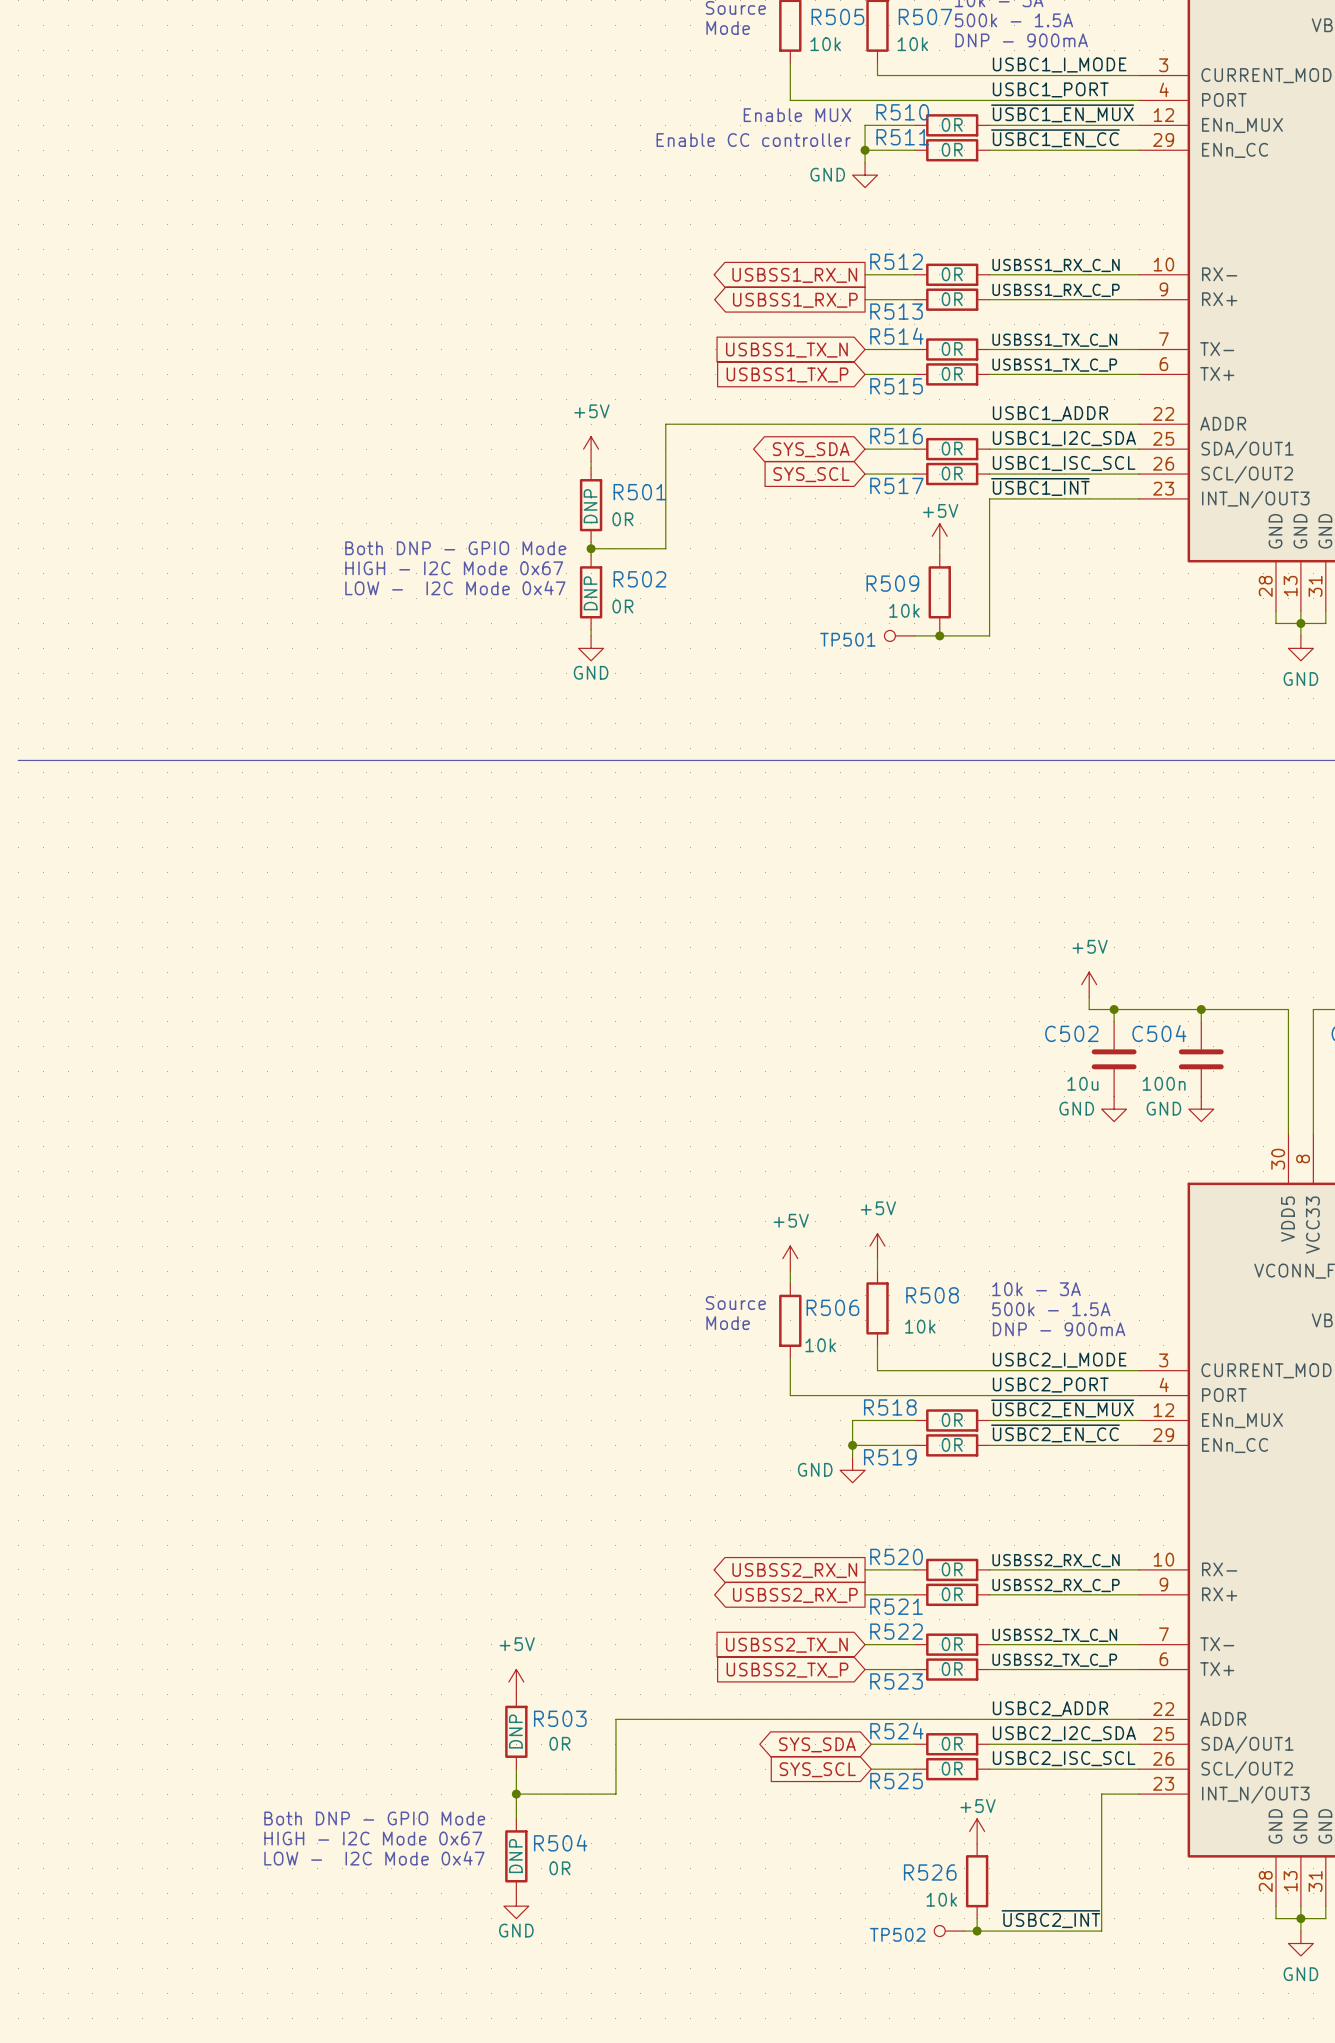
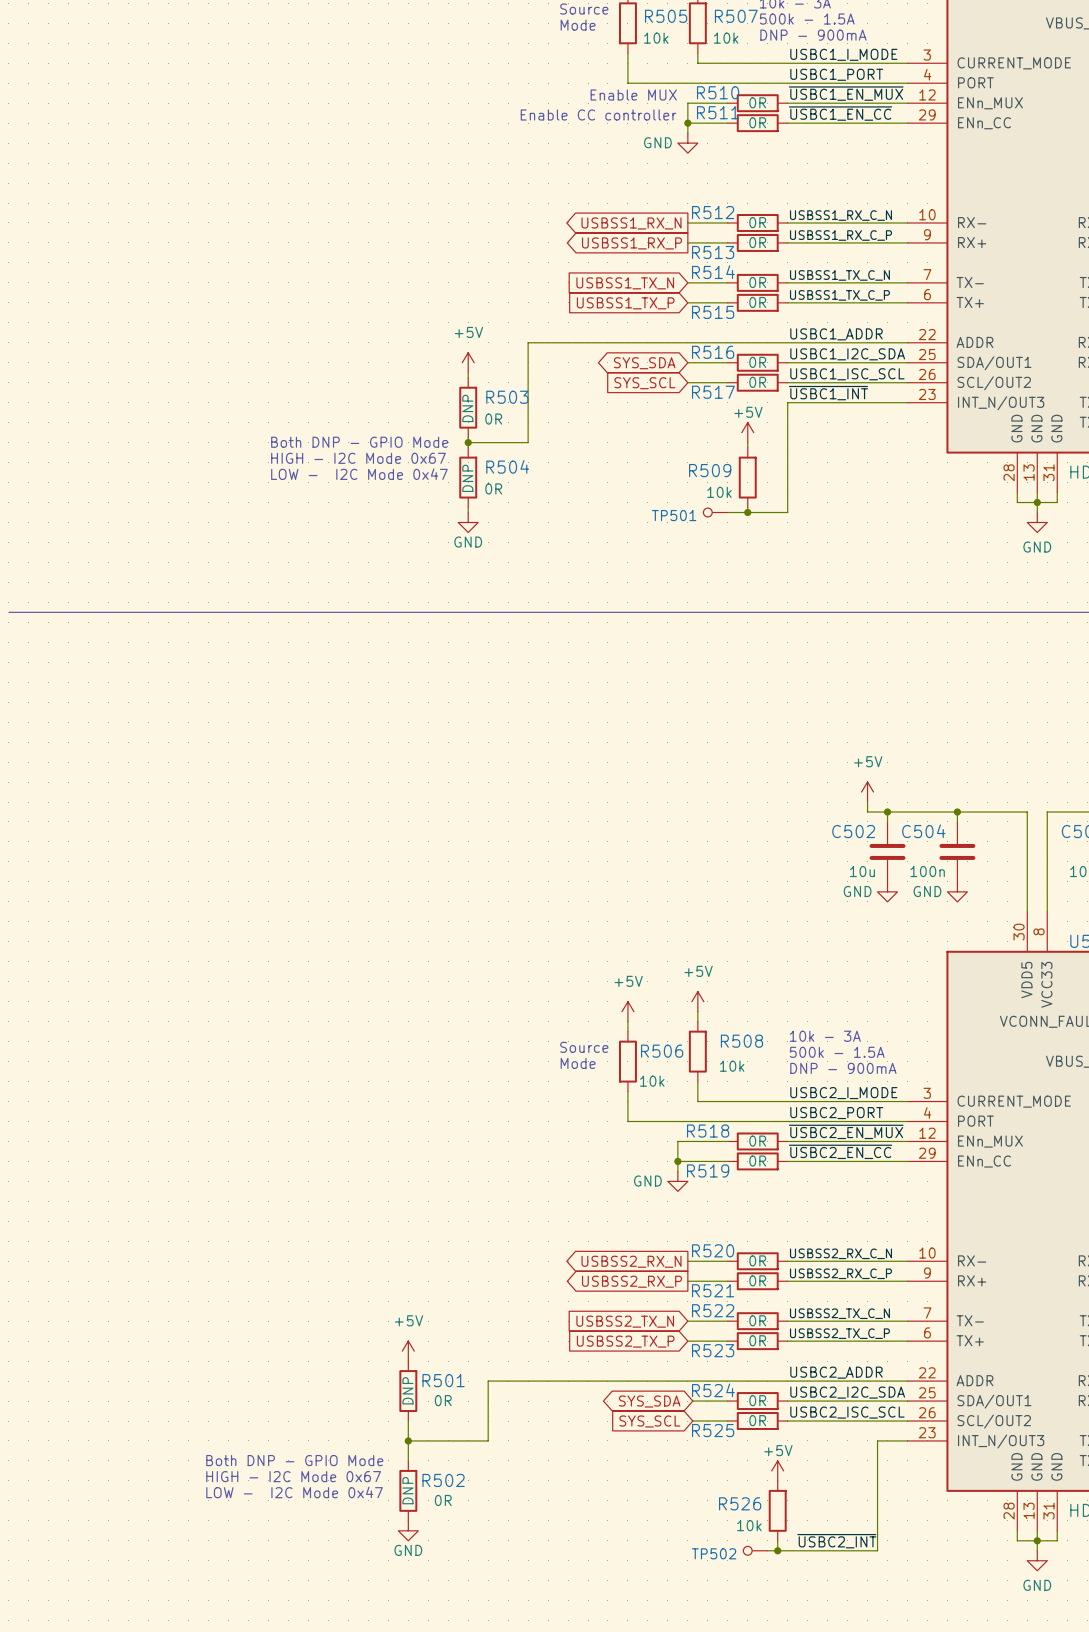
R501 name: R501 (639, 492) -> R503 (507, 397)
R502 name: R502 (639, 579) -> R504 (507, 466)
R503 name: R503 (560, 1718) -> R501 (443, 1380)
R504 name: R504 (560, 1842) -> R502 (443, 1480)

